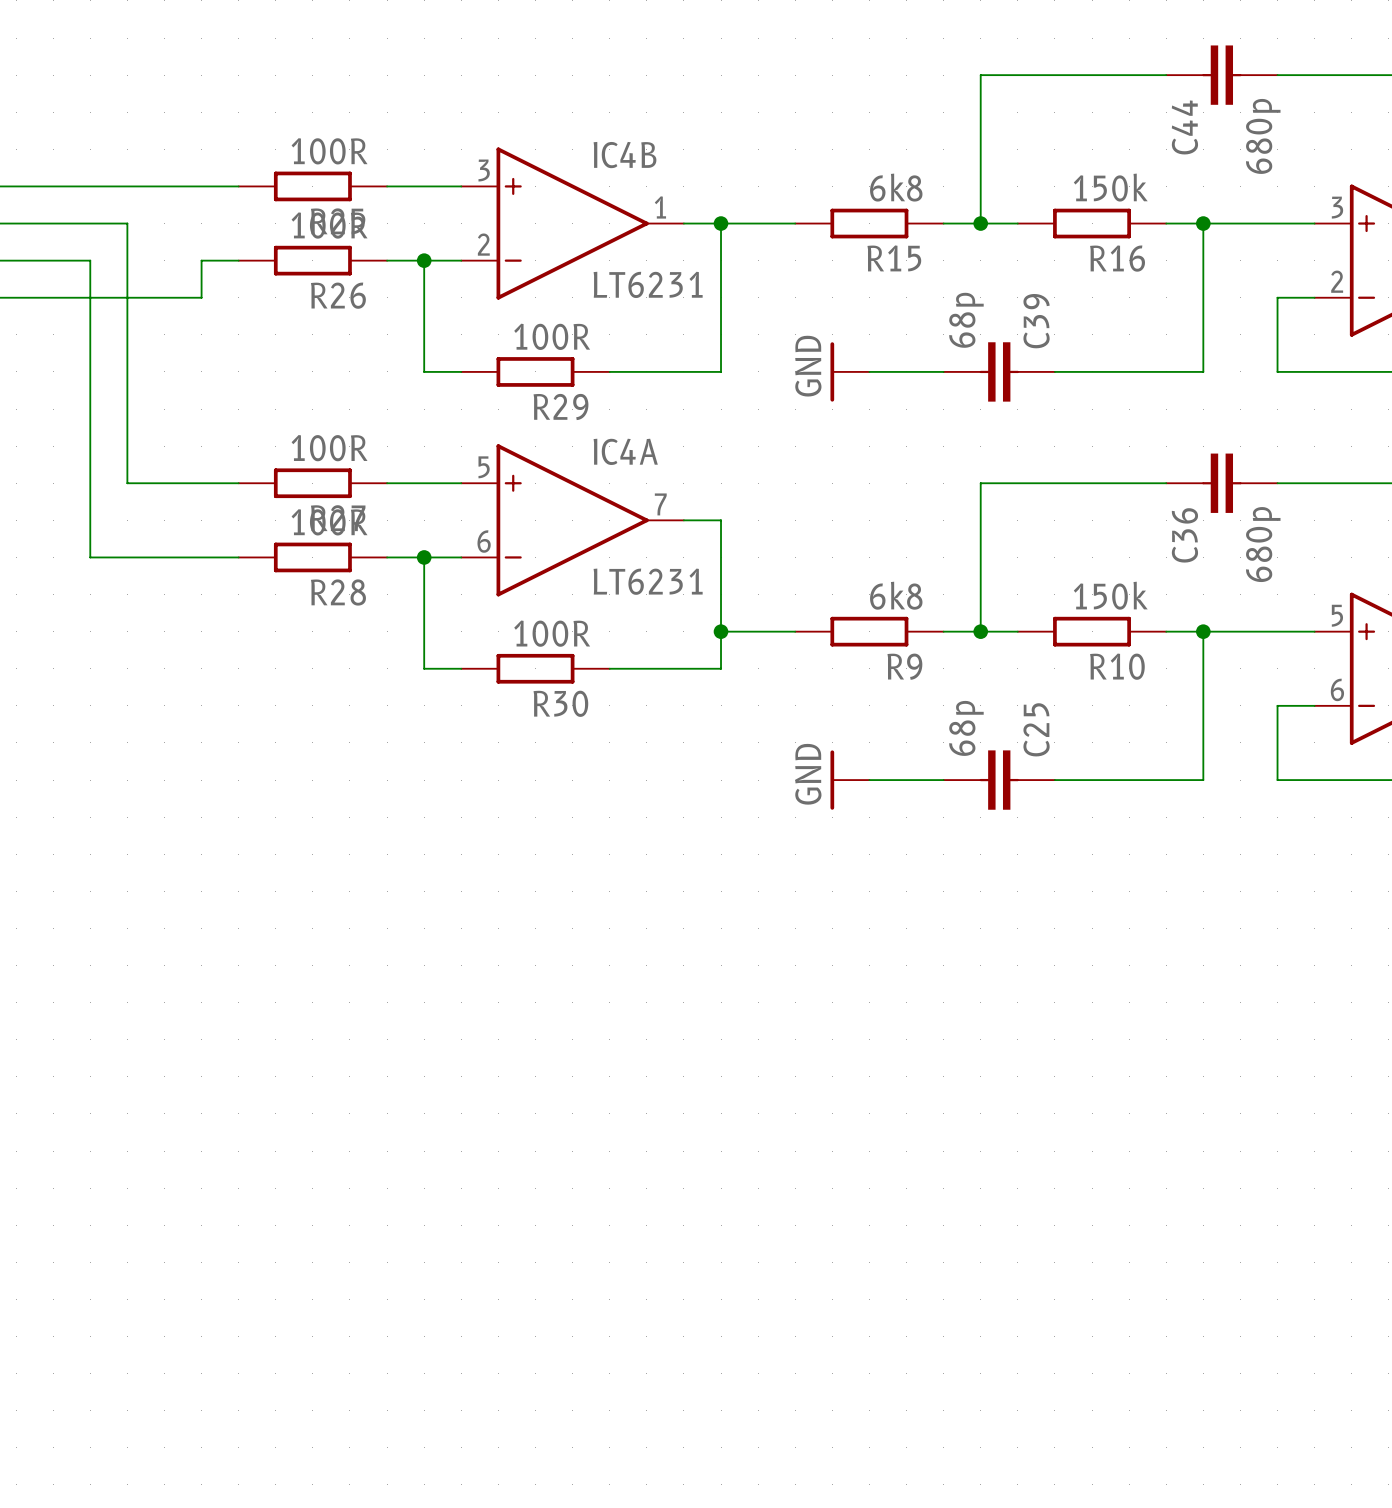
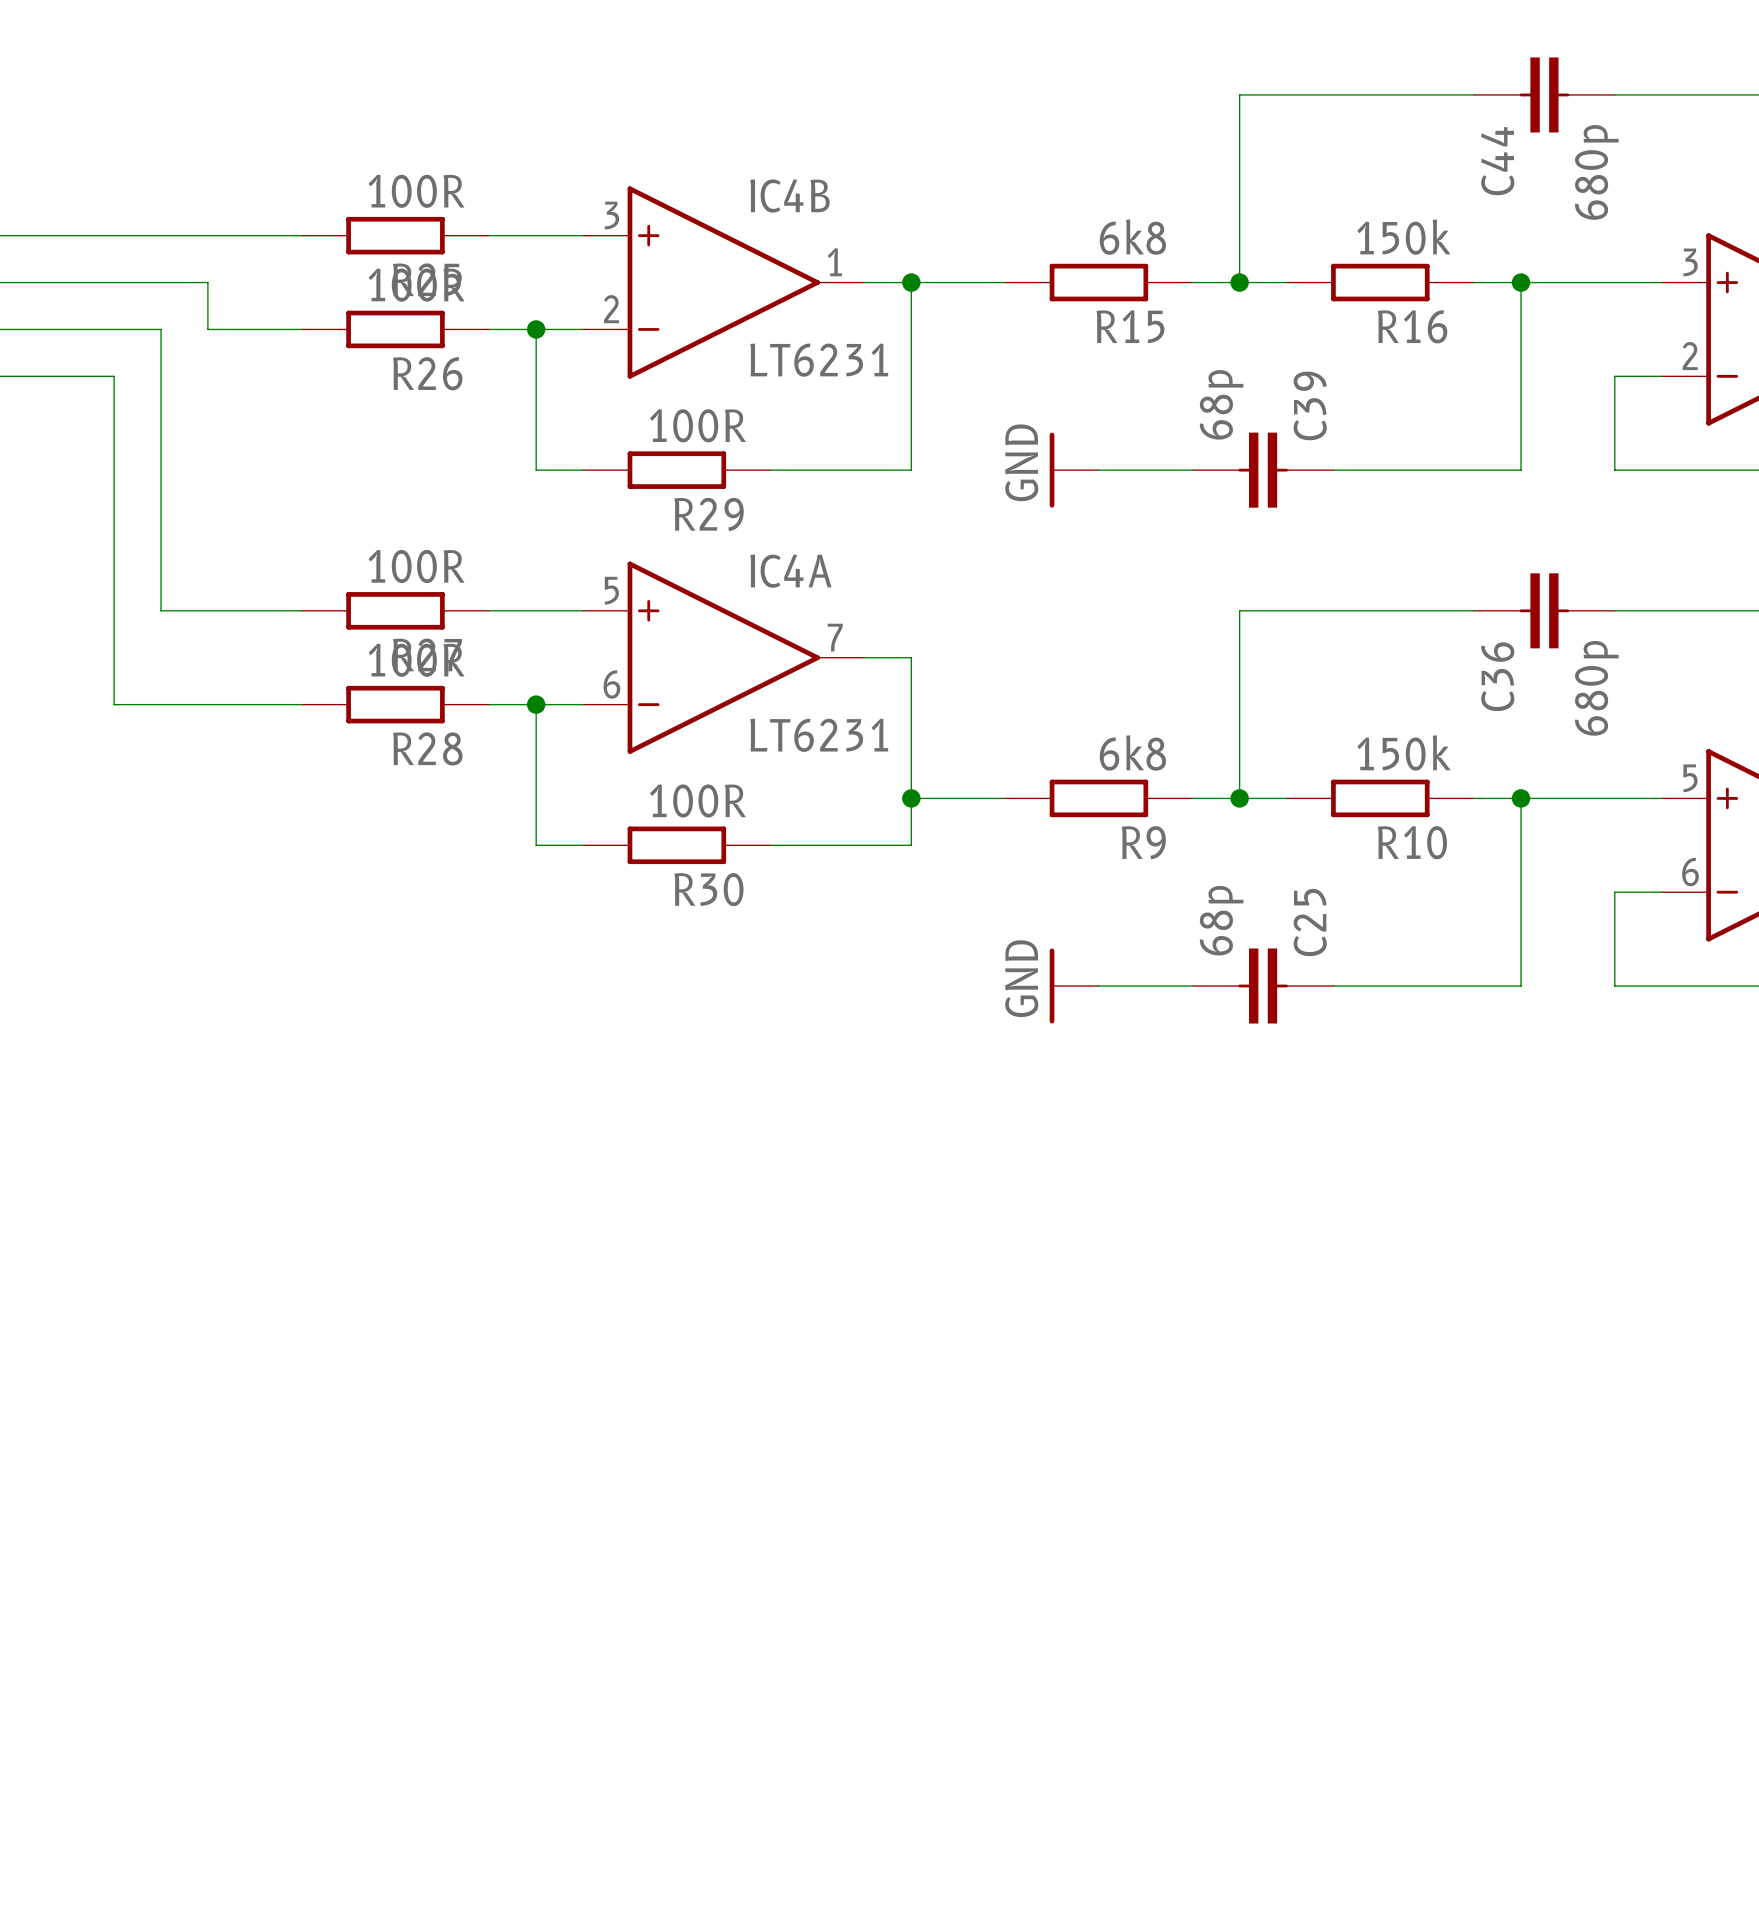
wire: (127, 223) (127, 260) -> (114, 329) (161, 329)
wire: (90, 260) (90, 297) (201, 297) (201, 260) -> (161, 282) (207, 282) (207, 329) (254, 329)

